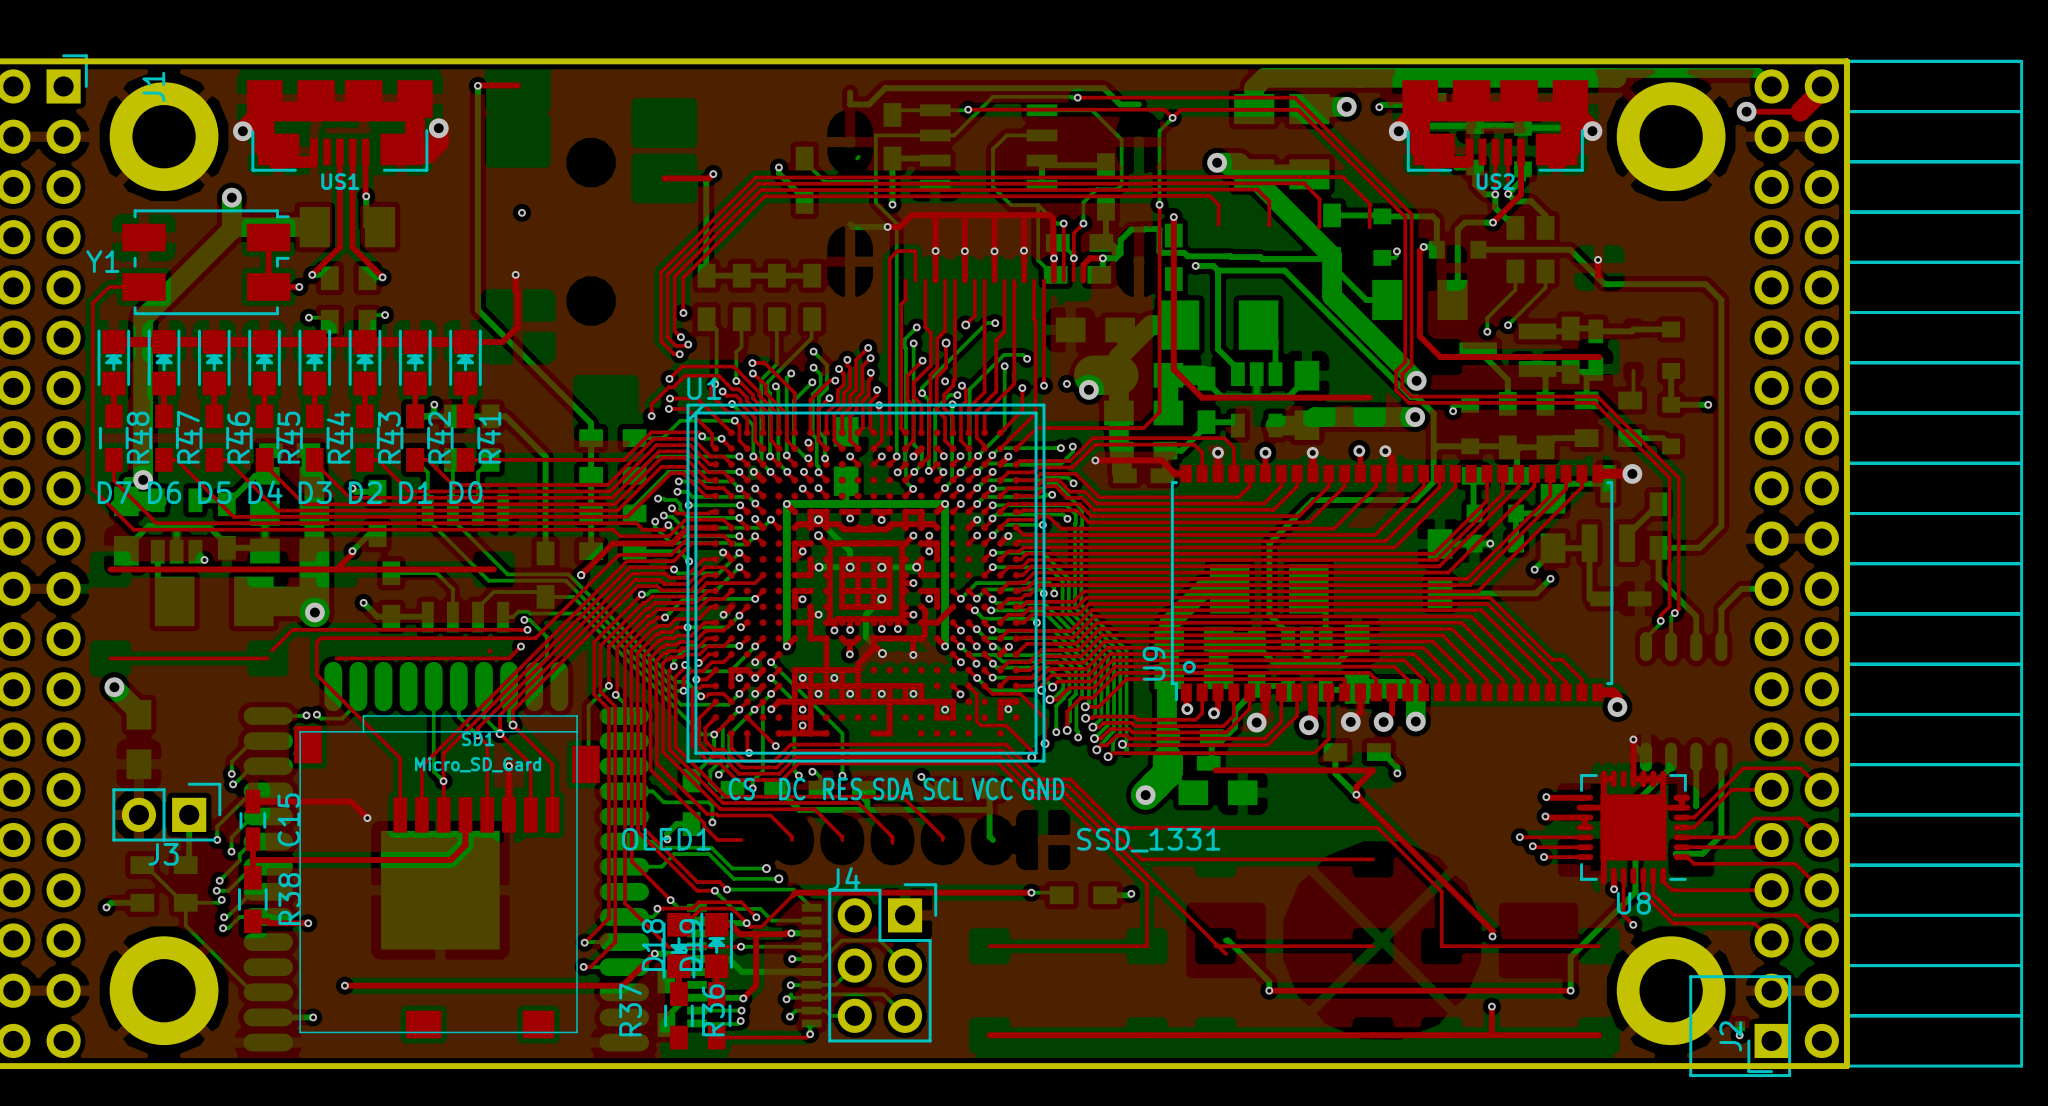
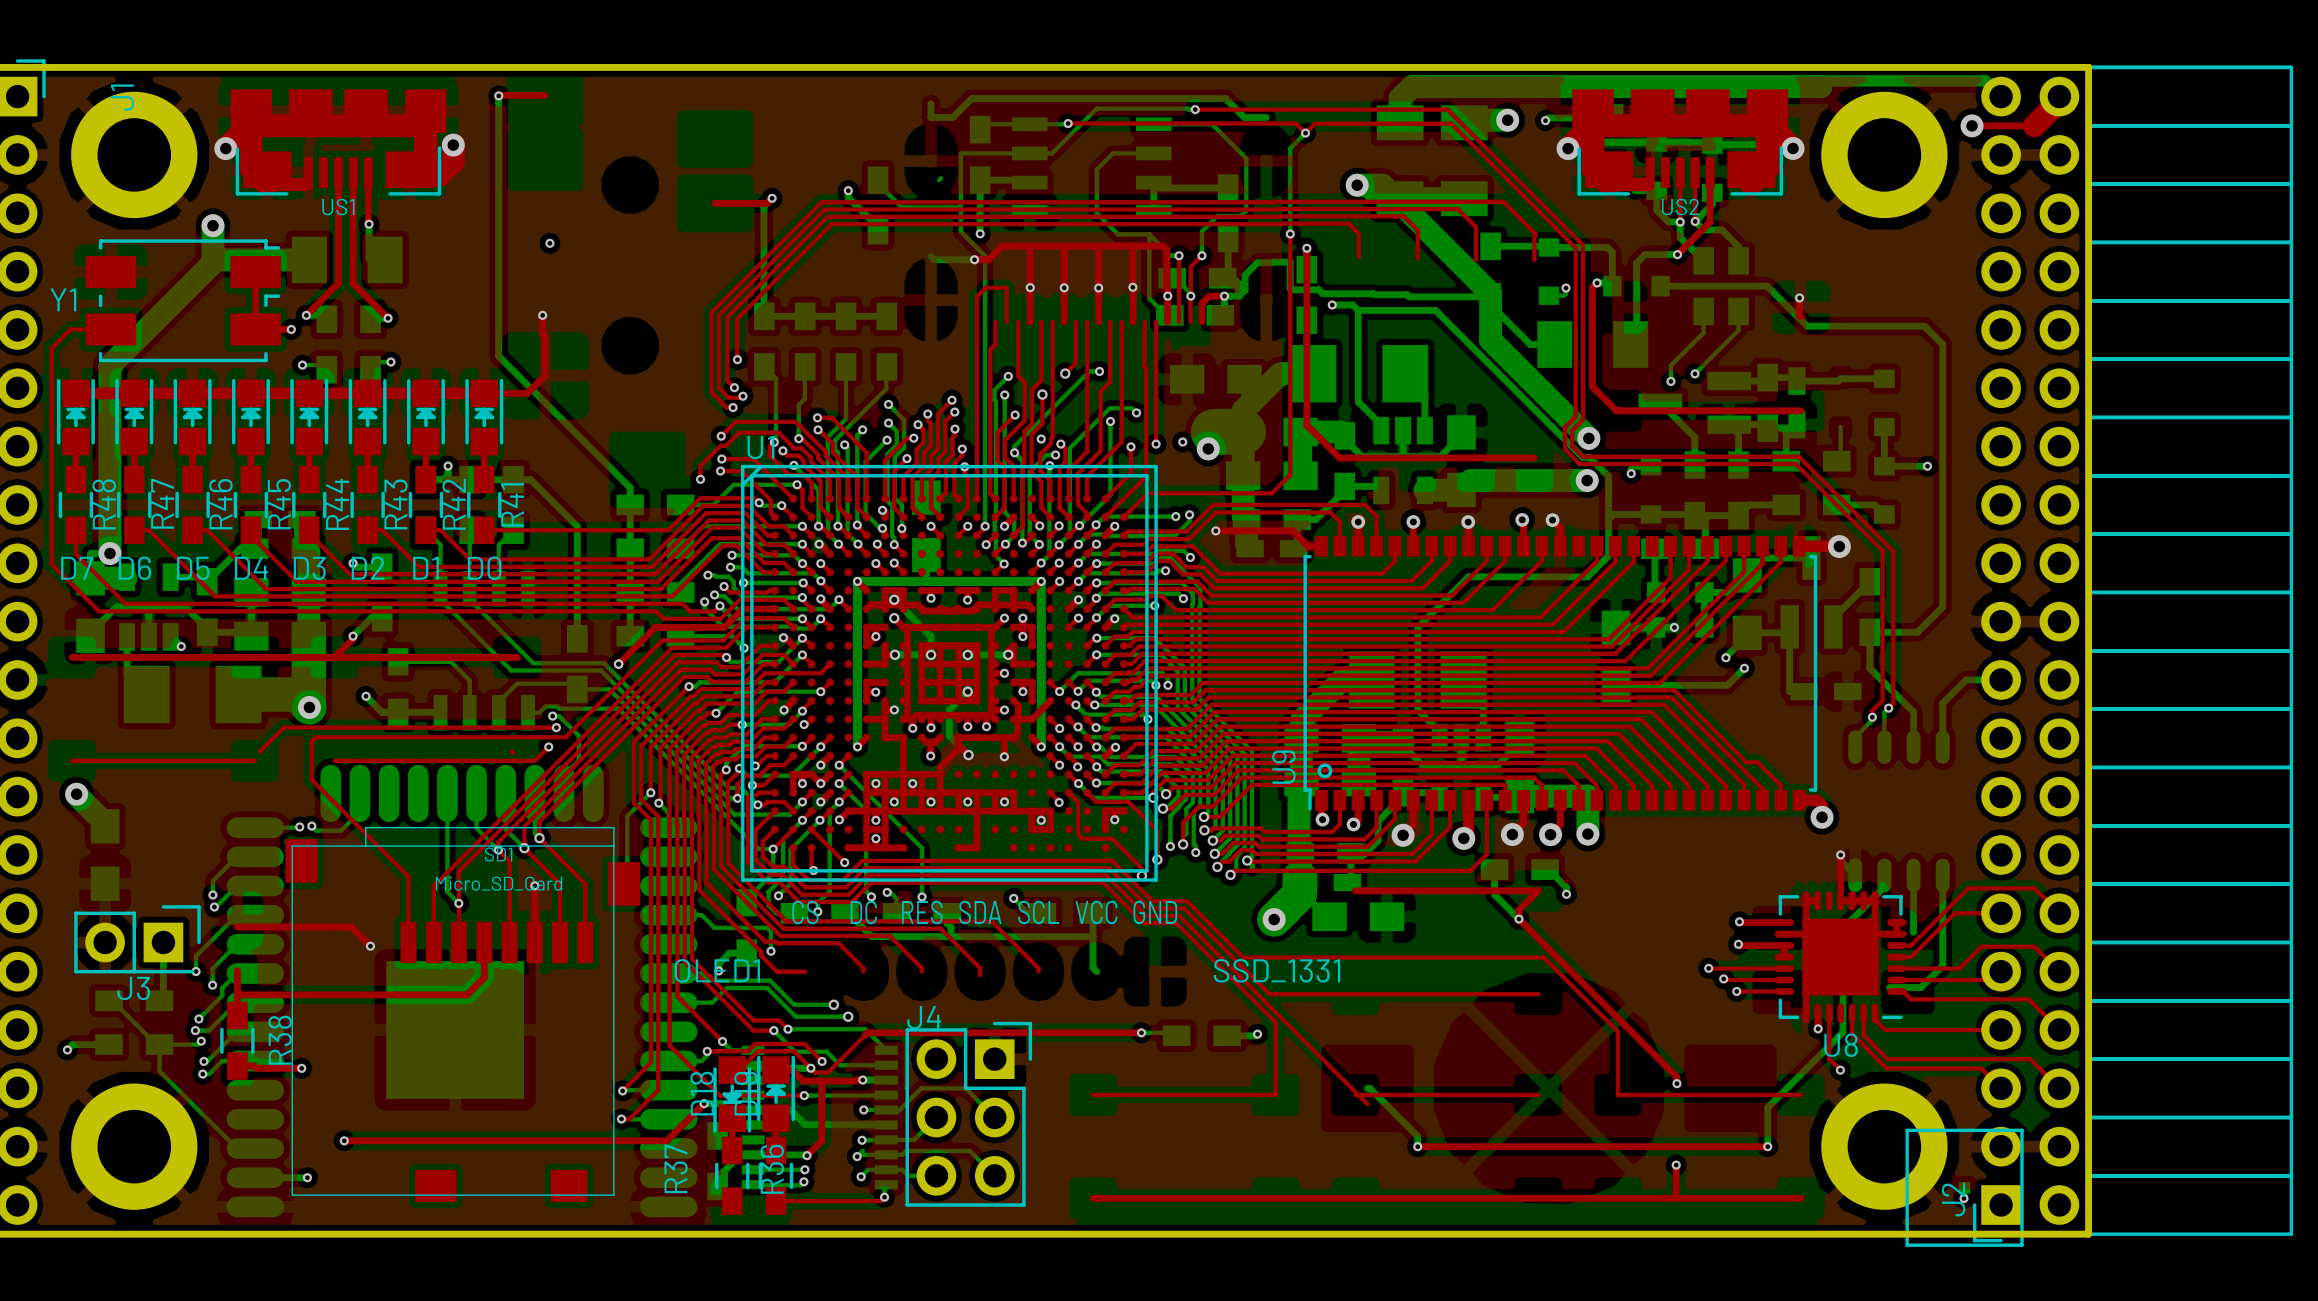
C15: (252, 820) -> none

